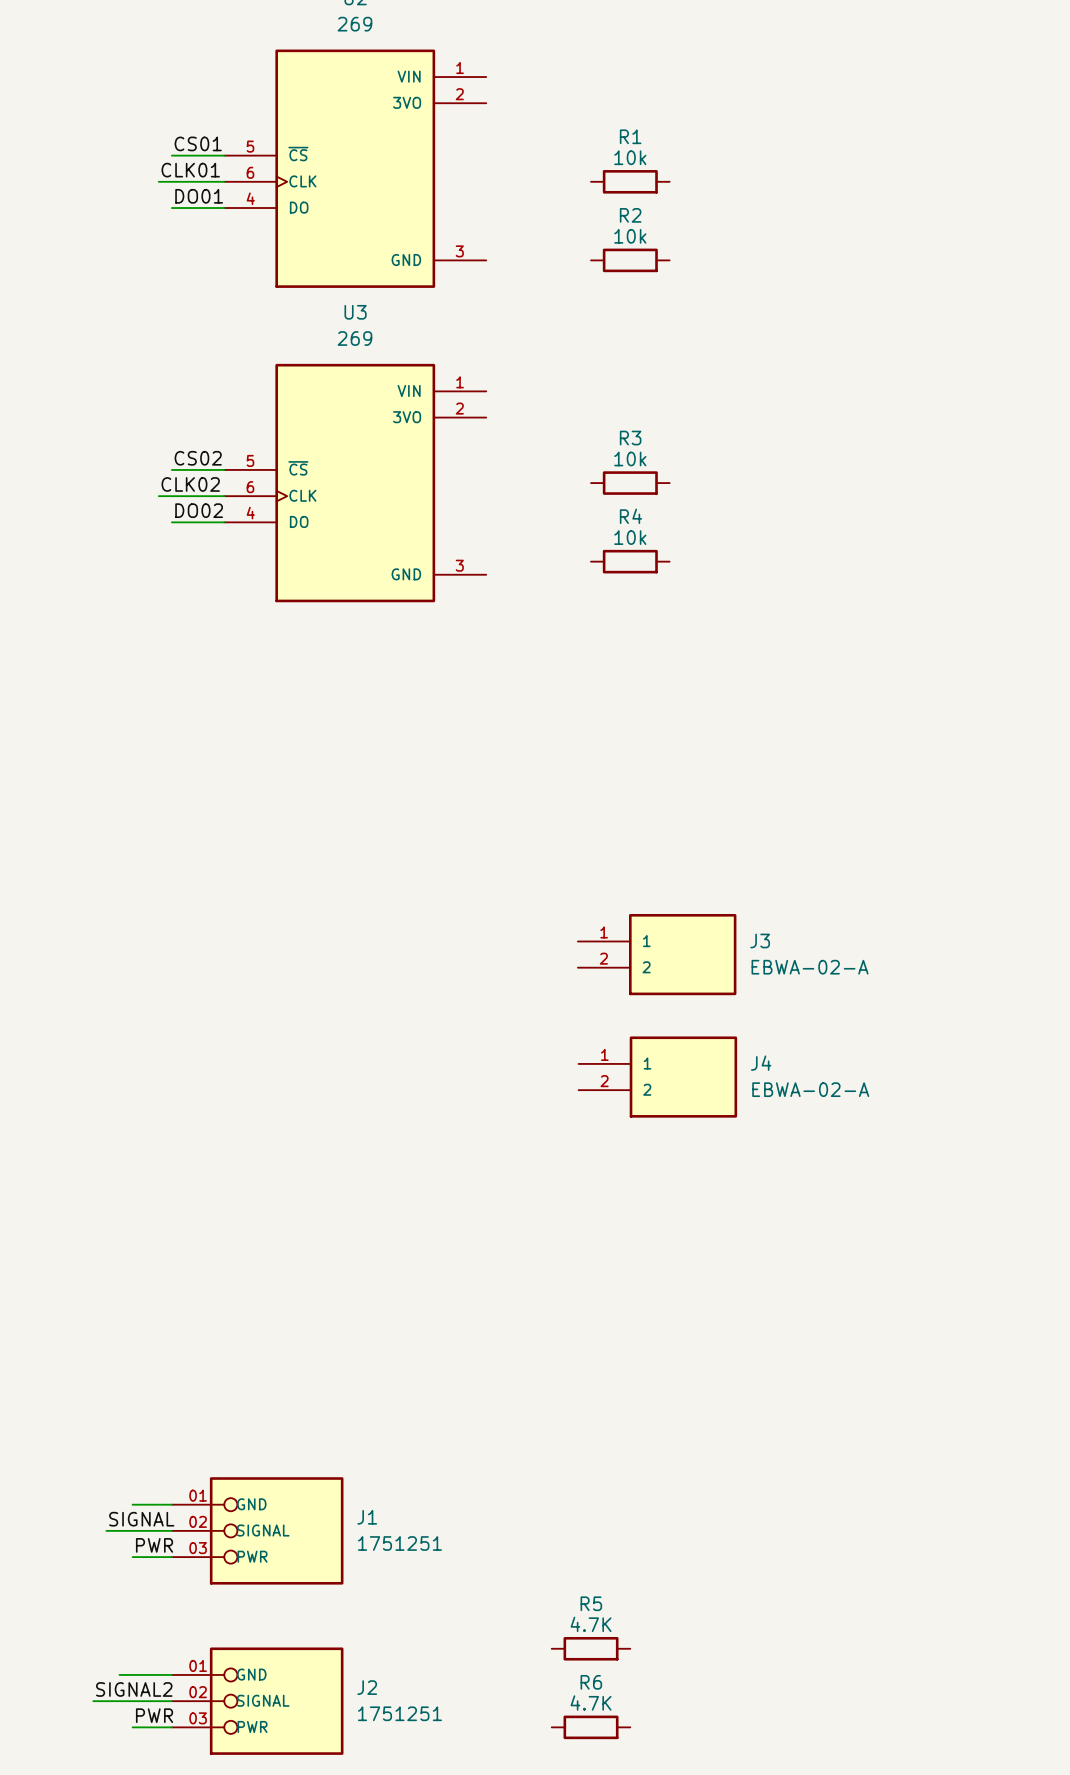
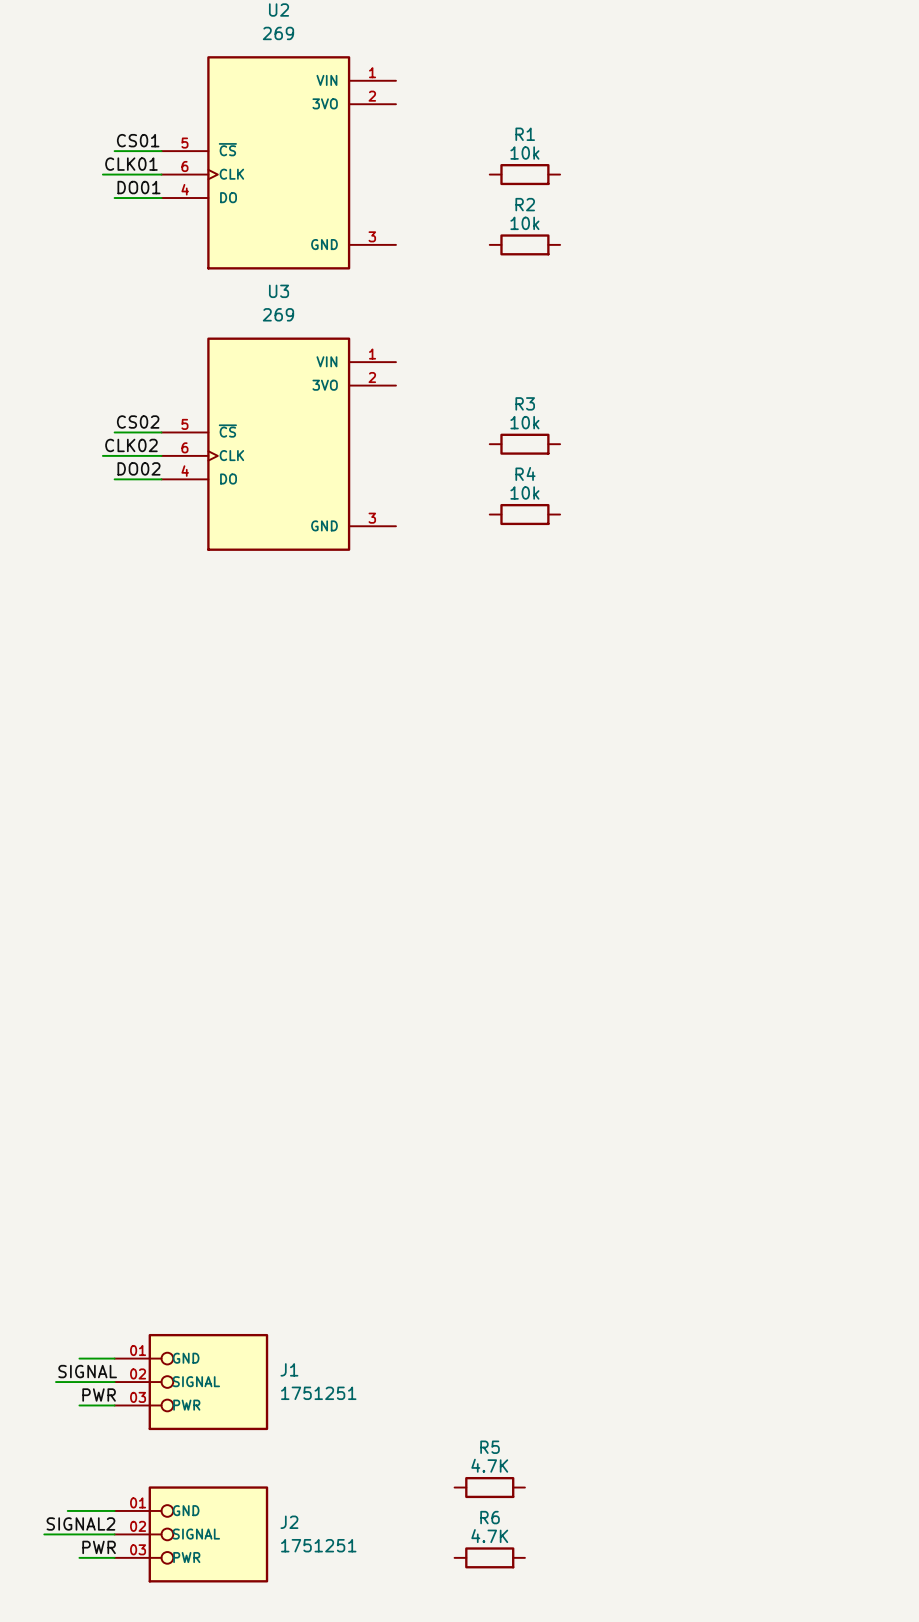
J3: EBWA-02-A (657, 954) -> none
J4: EBWA-02-A (657, 1077) -> none

